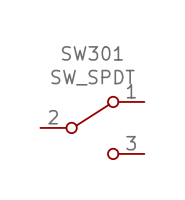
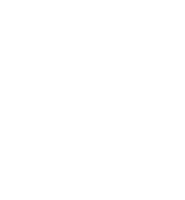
SW301: SW_SPDT (92, 127) -> none

